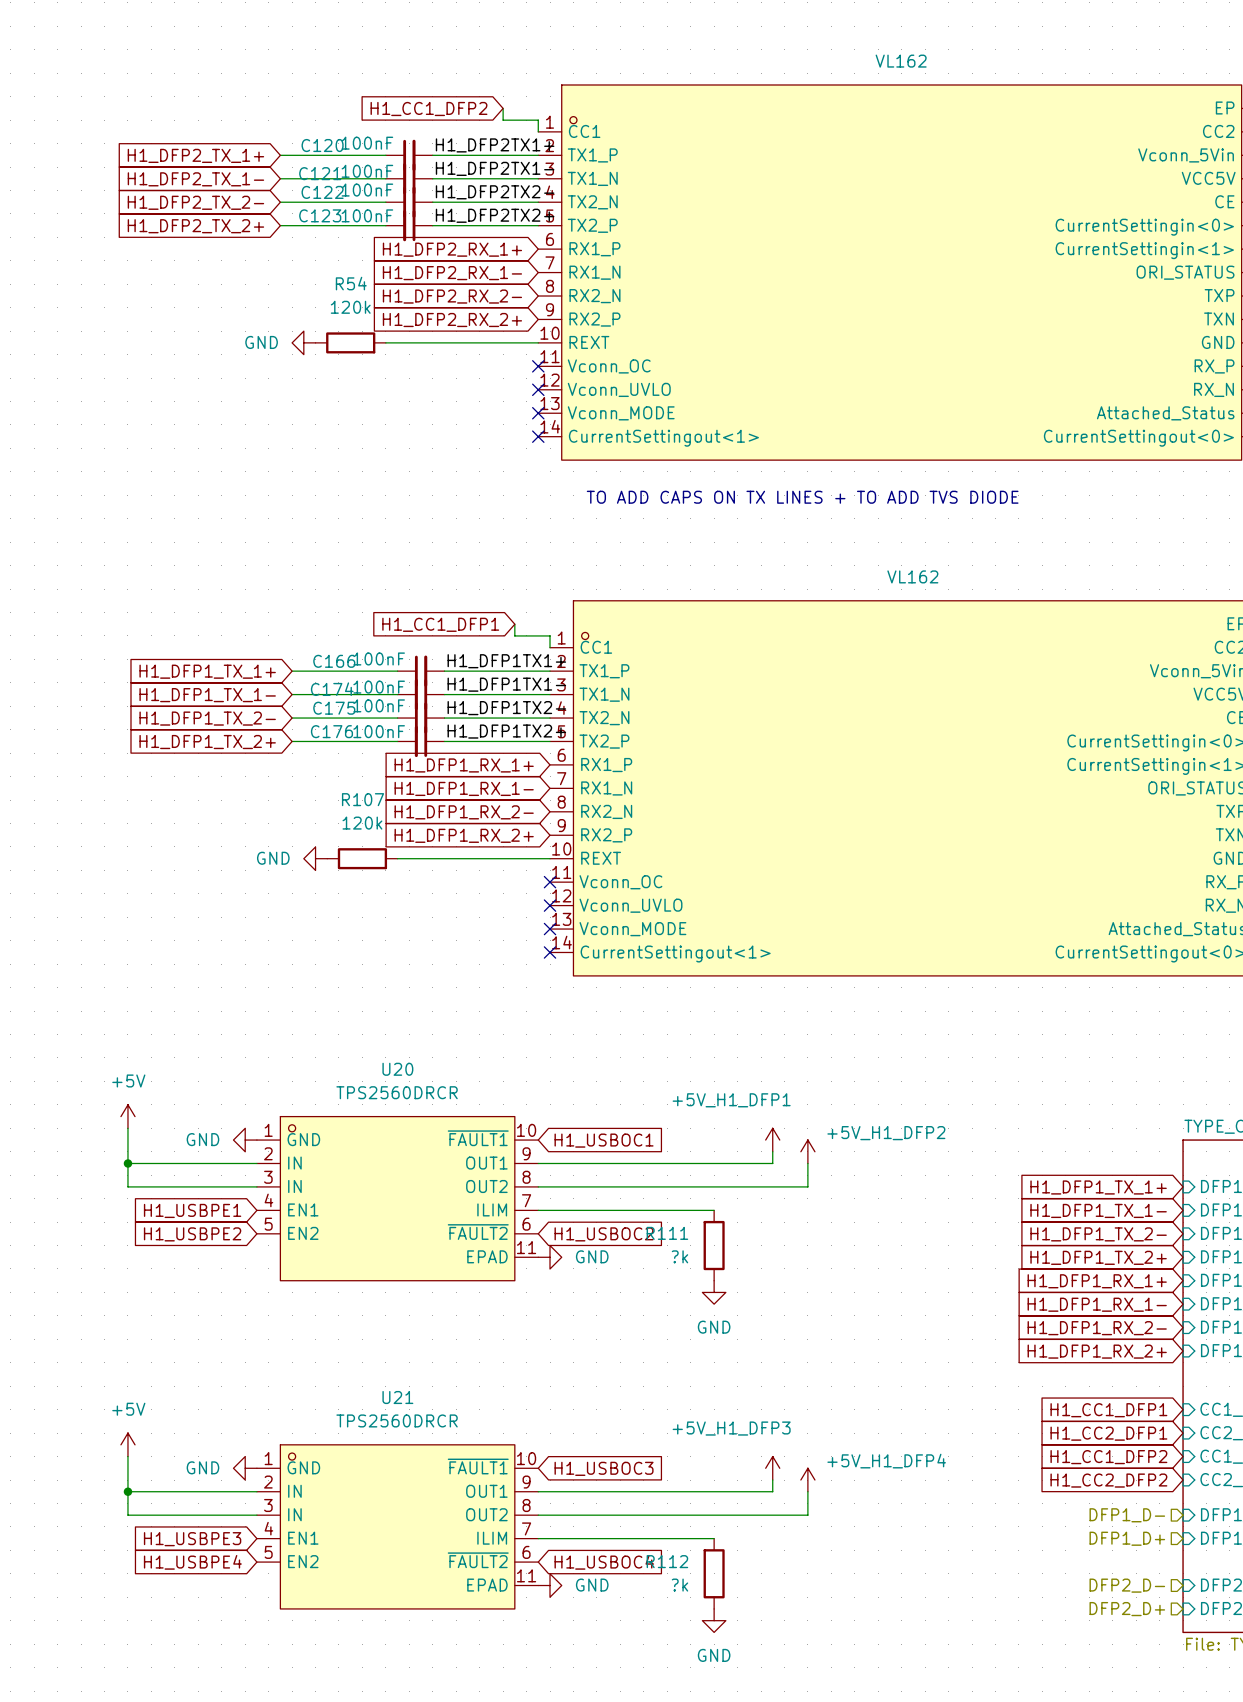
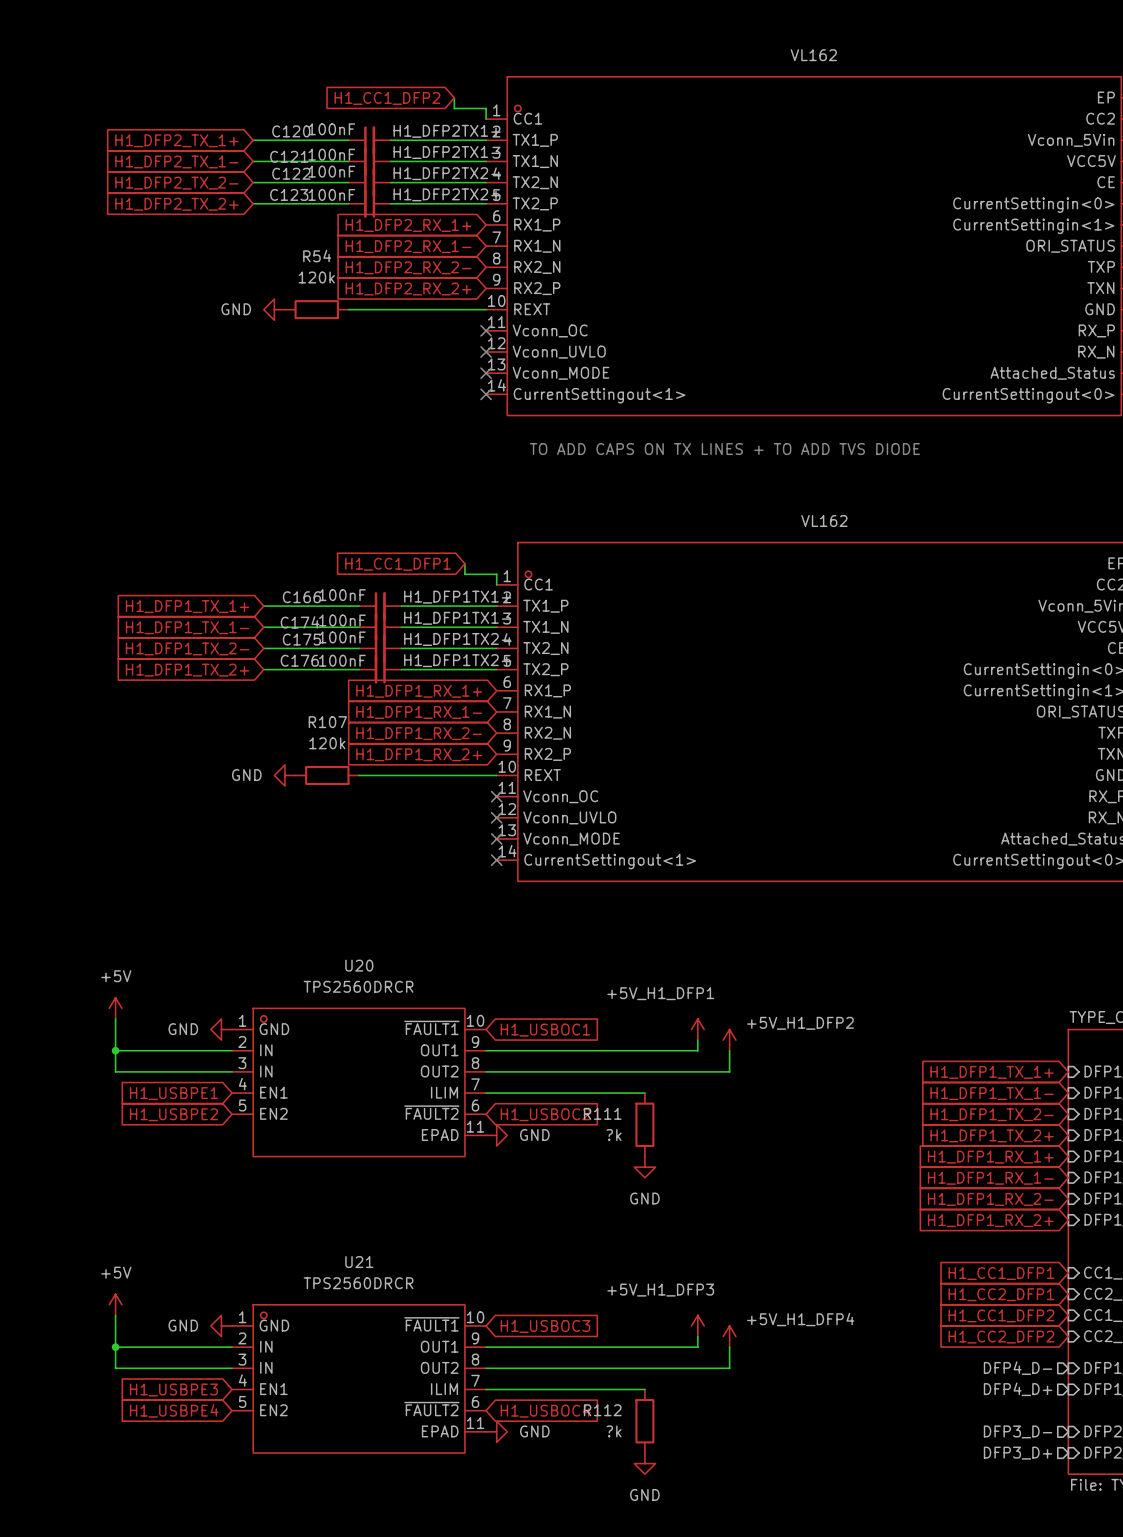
hierarchical label: DFP1_D- (1127, 1515) -> DFP4_D- (1018, 1368)
hierarchical label: DFP1_D+ (1127, 1538) -> DFP4_D+ (1018, 1389)
hierarchical label: DFP2_D- (1127, 1585) -> DFP3_D- (1018, 1431)
hierarchical label: DFP2_D+ (1127, 1609) -> DFP3_D+ (1018, 1453)

